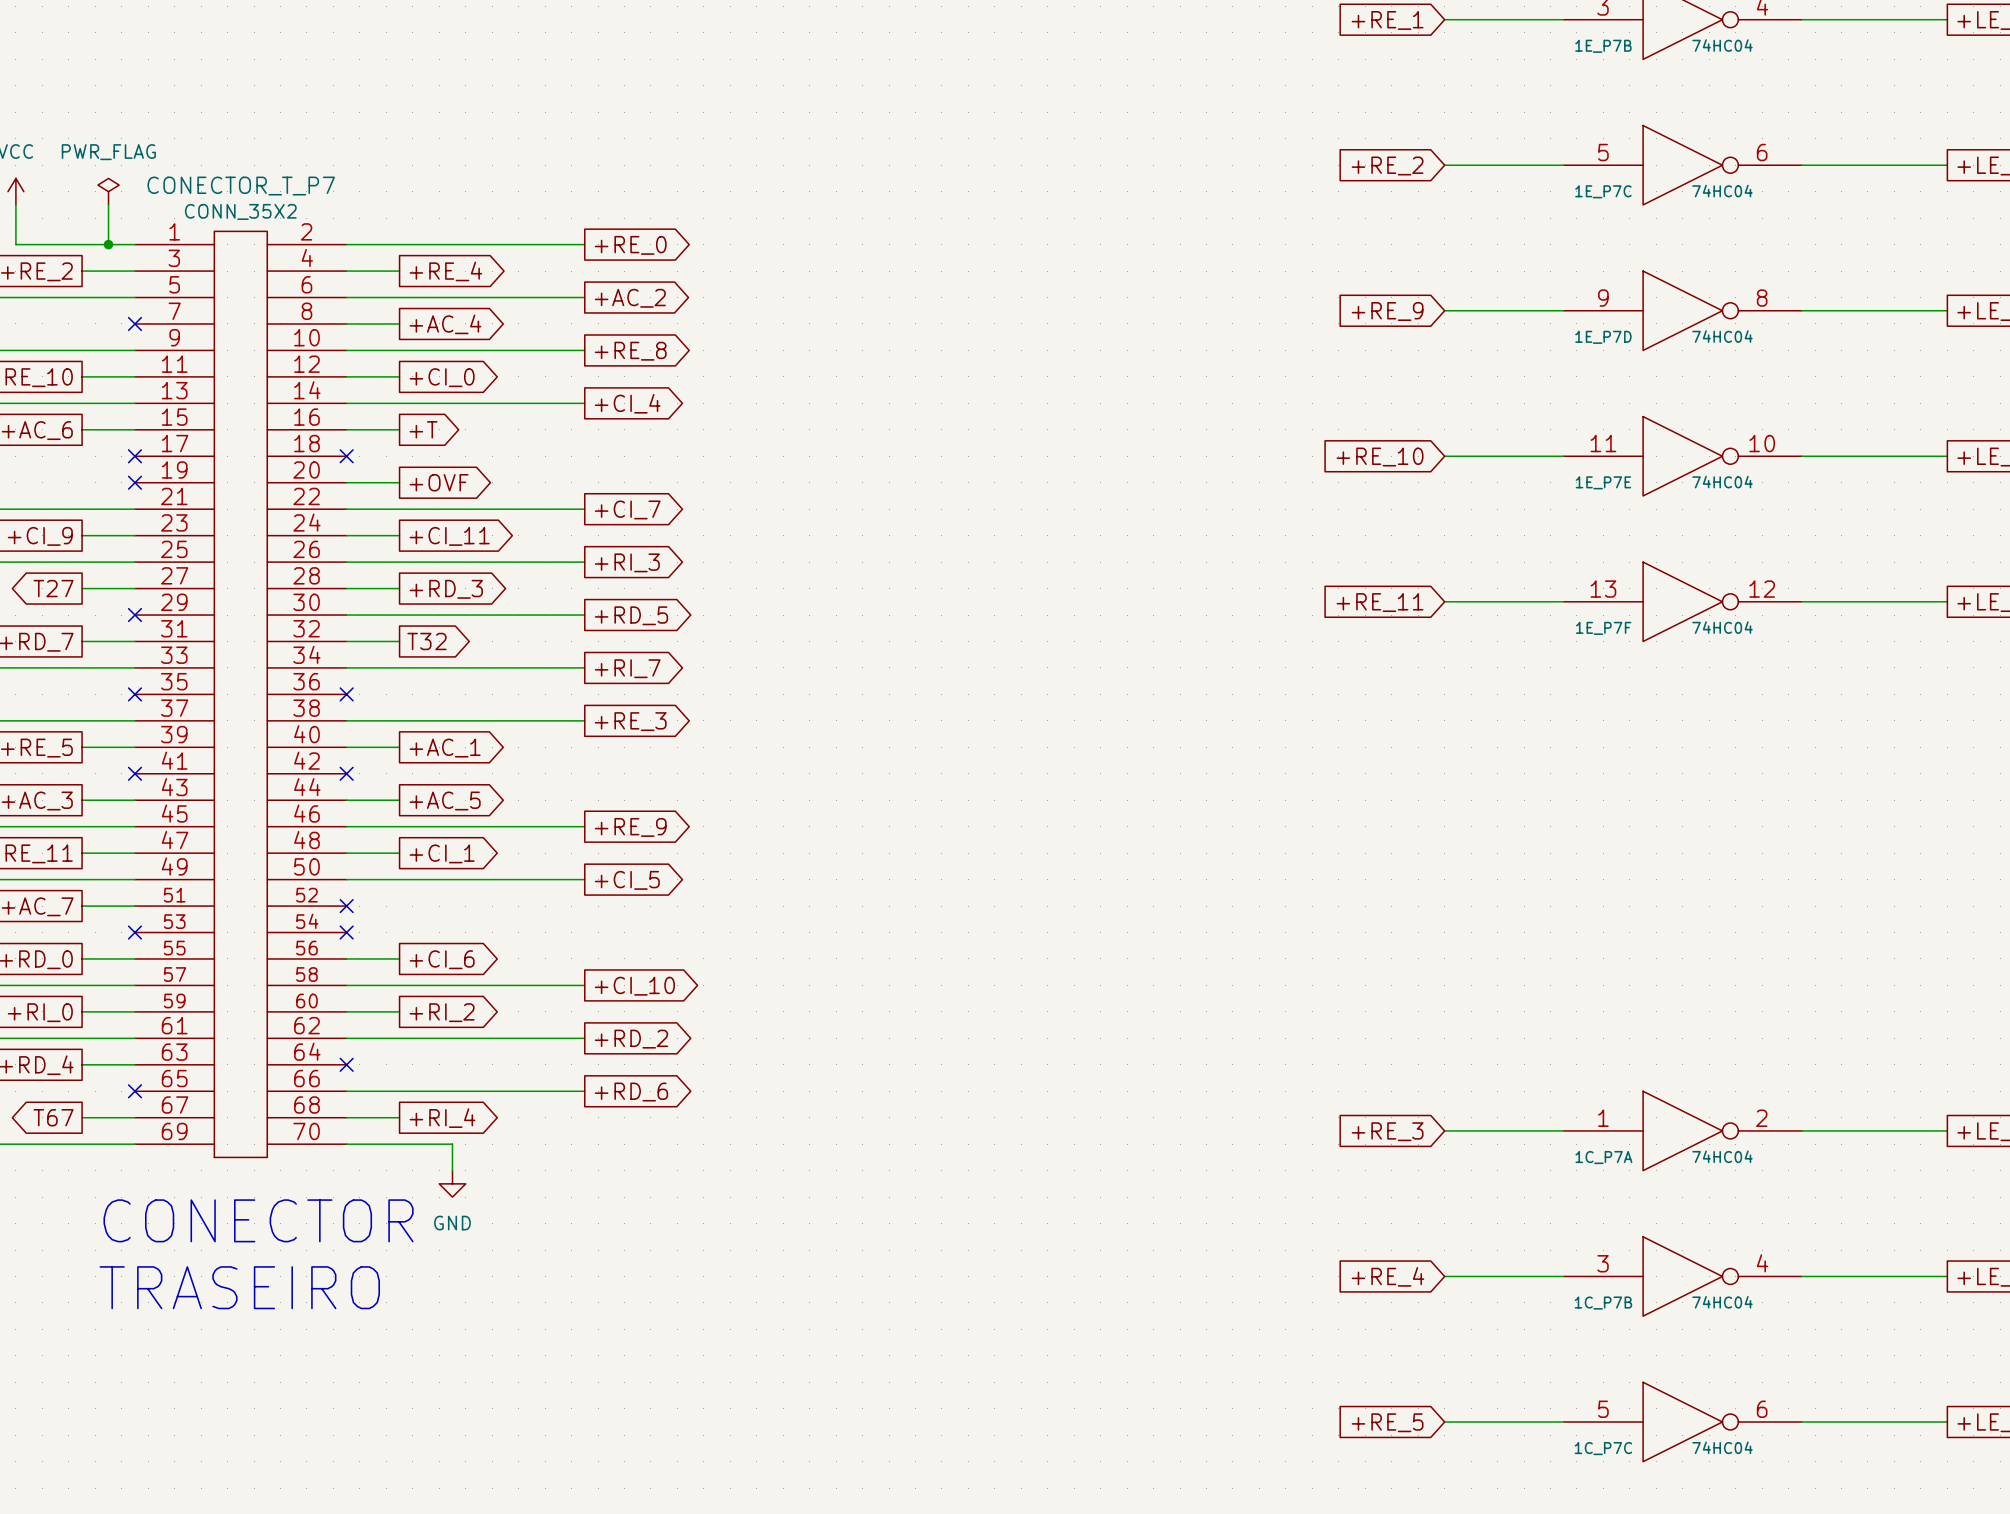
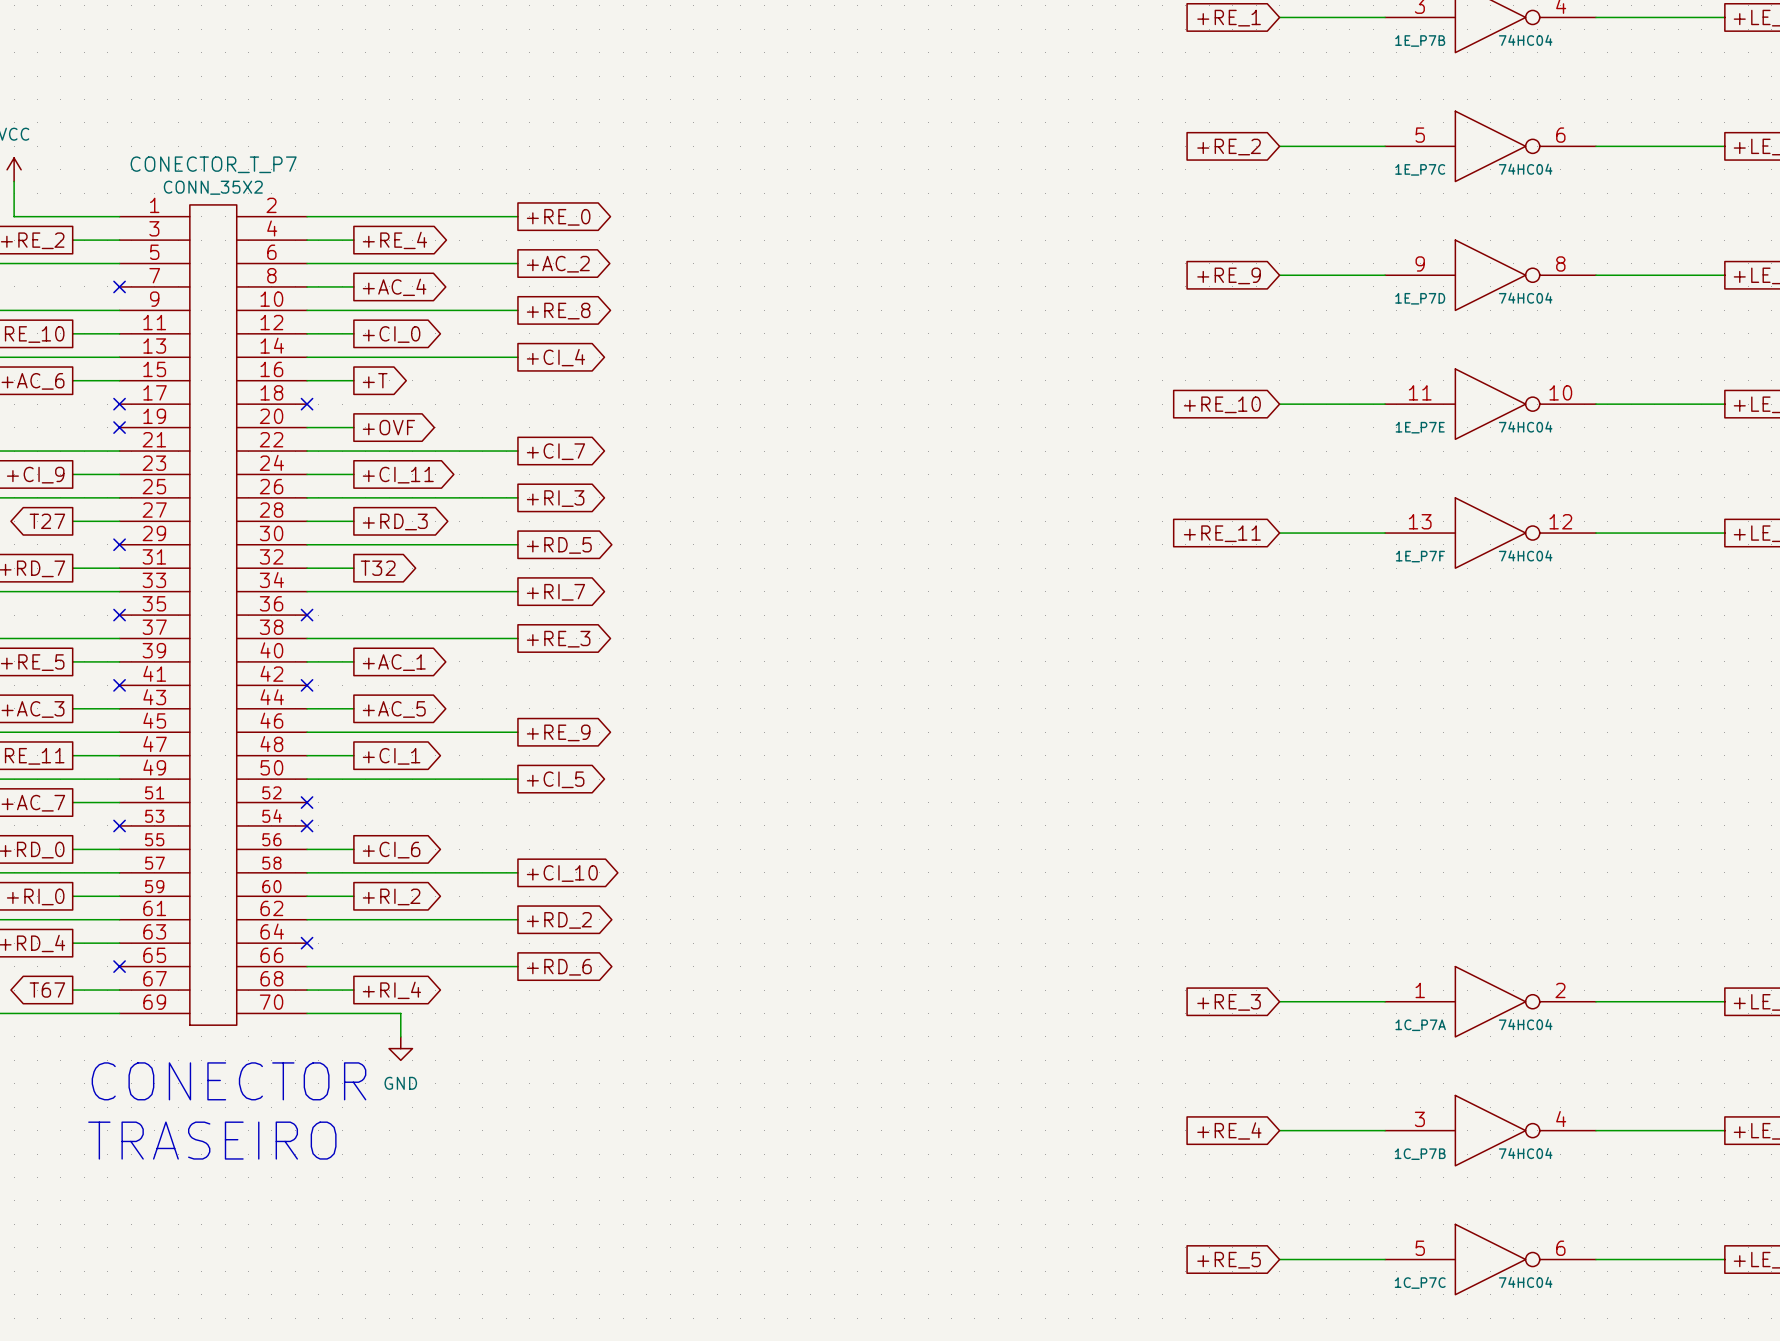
power symbol: PWR_FLAG (108, 191) -> none
wire: (108, 204) (108, 244) -> none
junction: (108, 244) -> none

